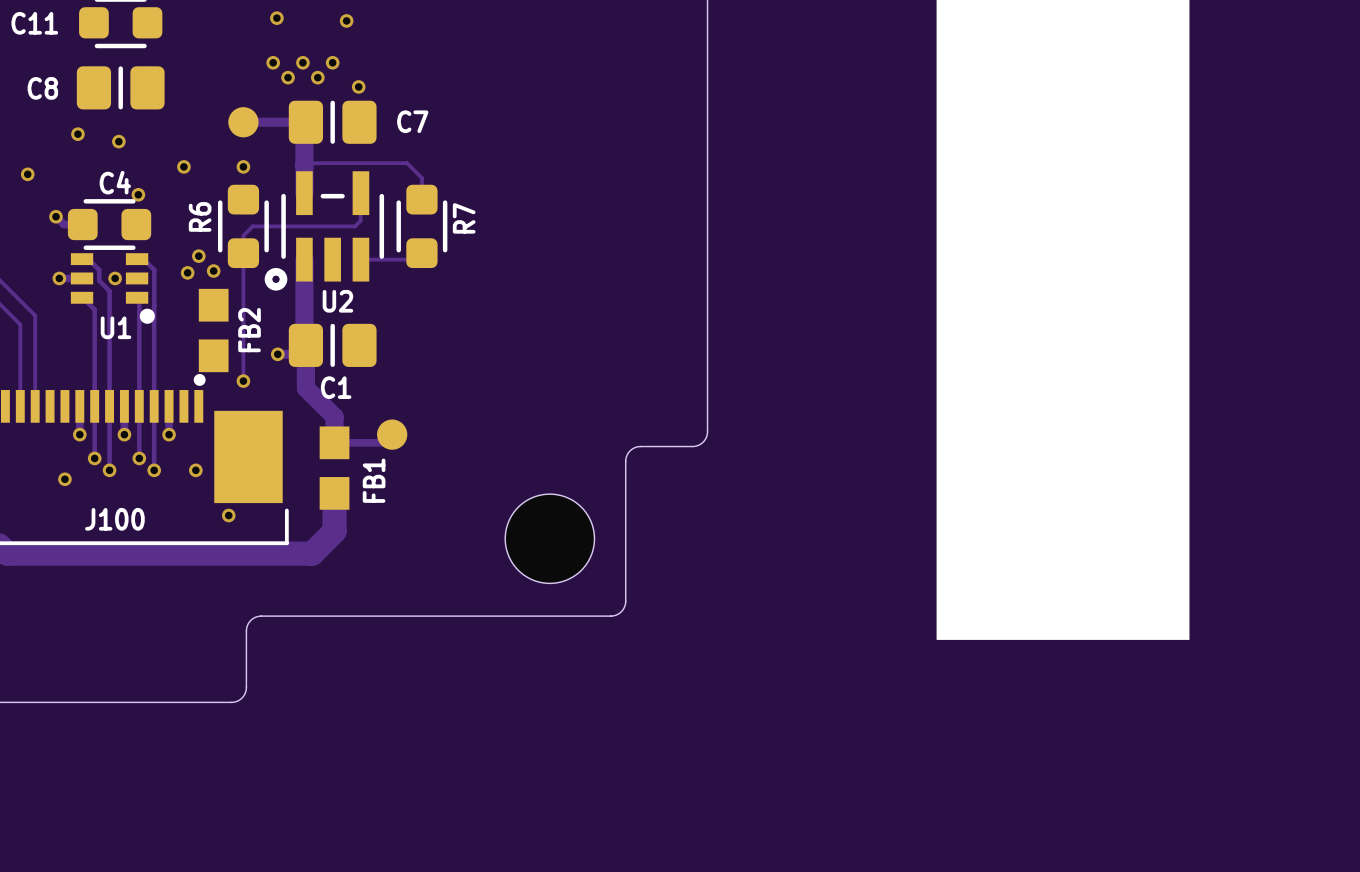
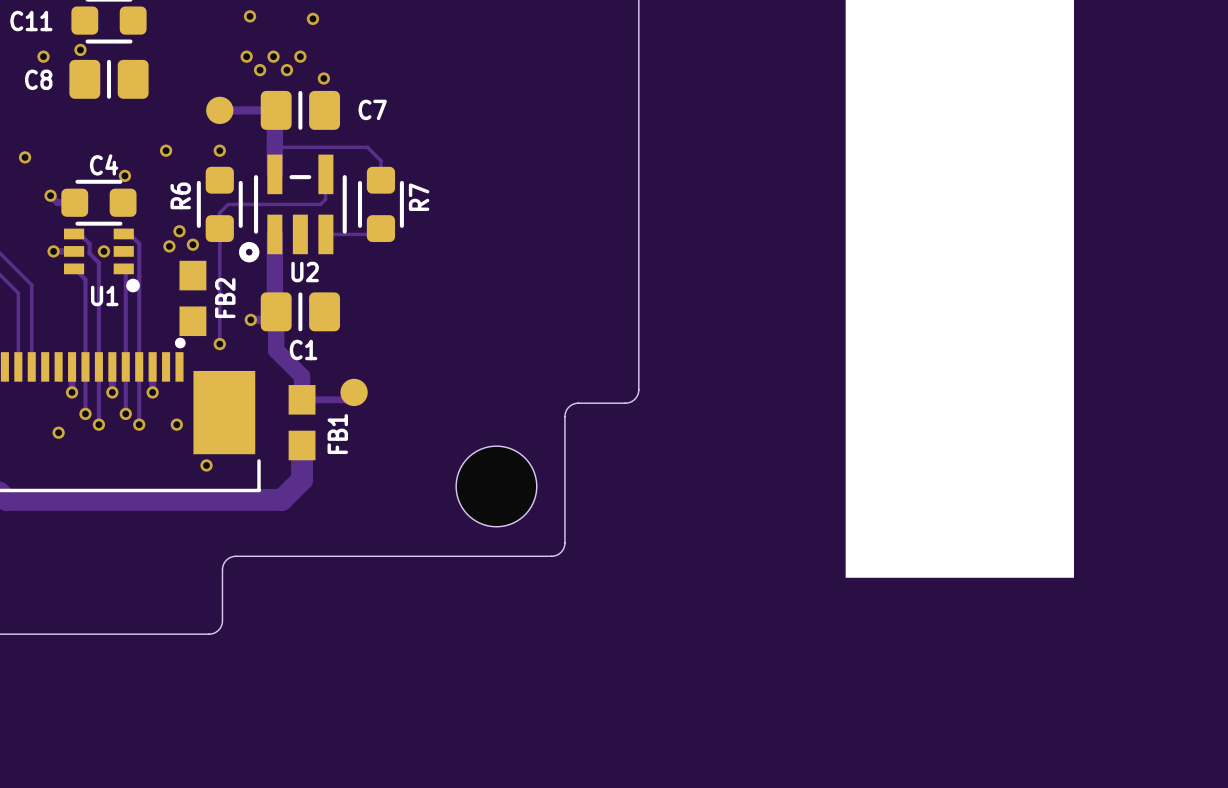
via: none -> (80, 49)
via: none -> (43, 56)
via: (77, 134) -> none
via: (118, 141) -> none
J100: (114, 519) -> none

